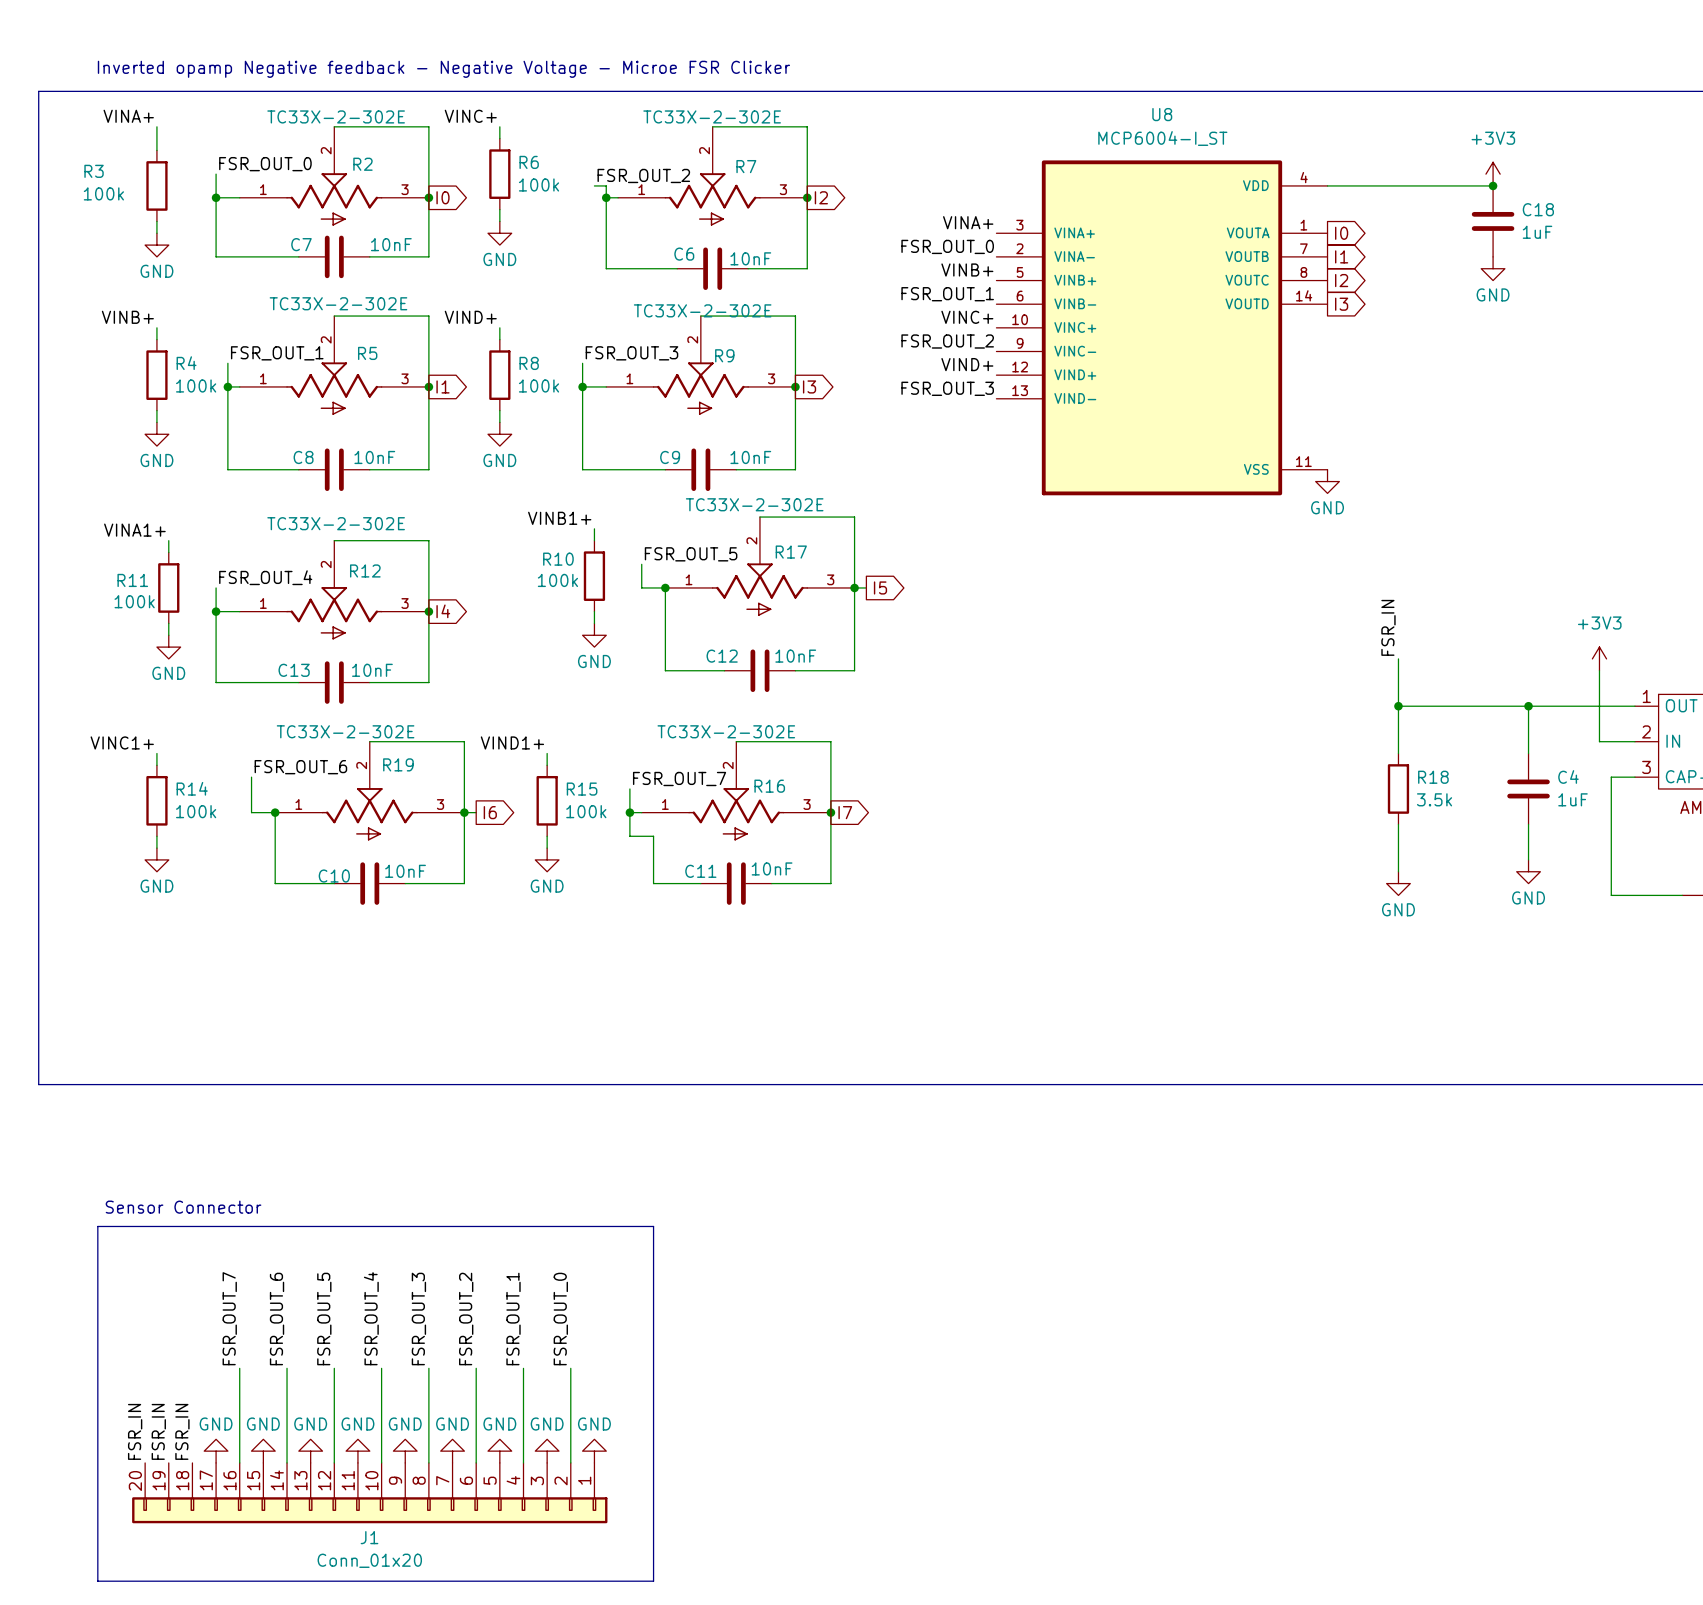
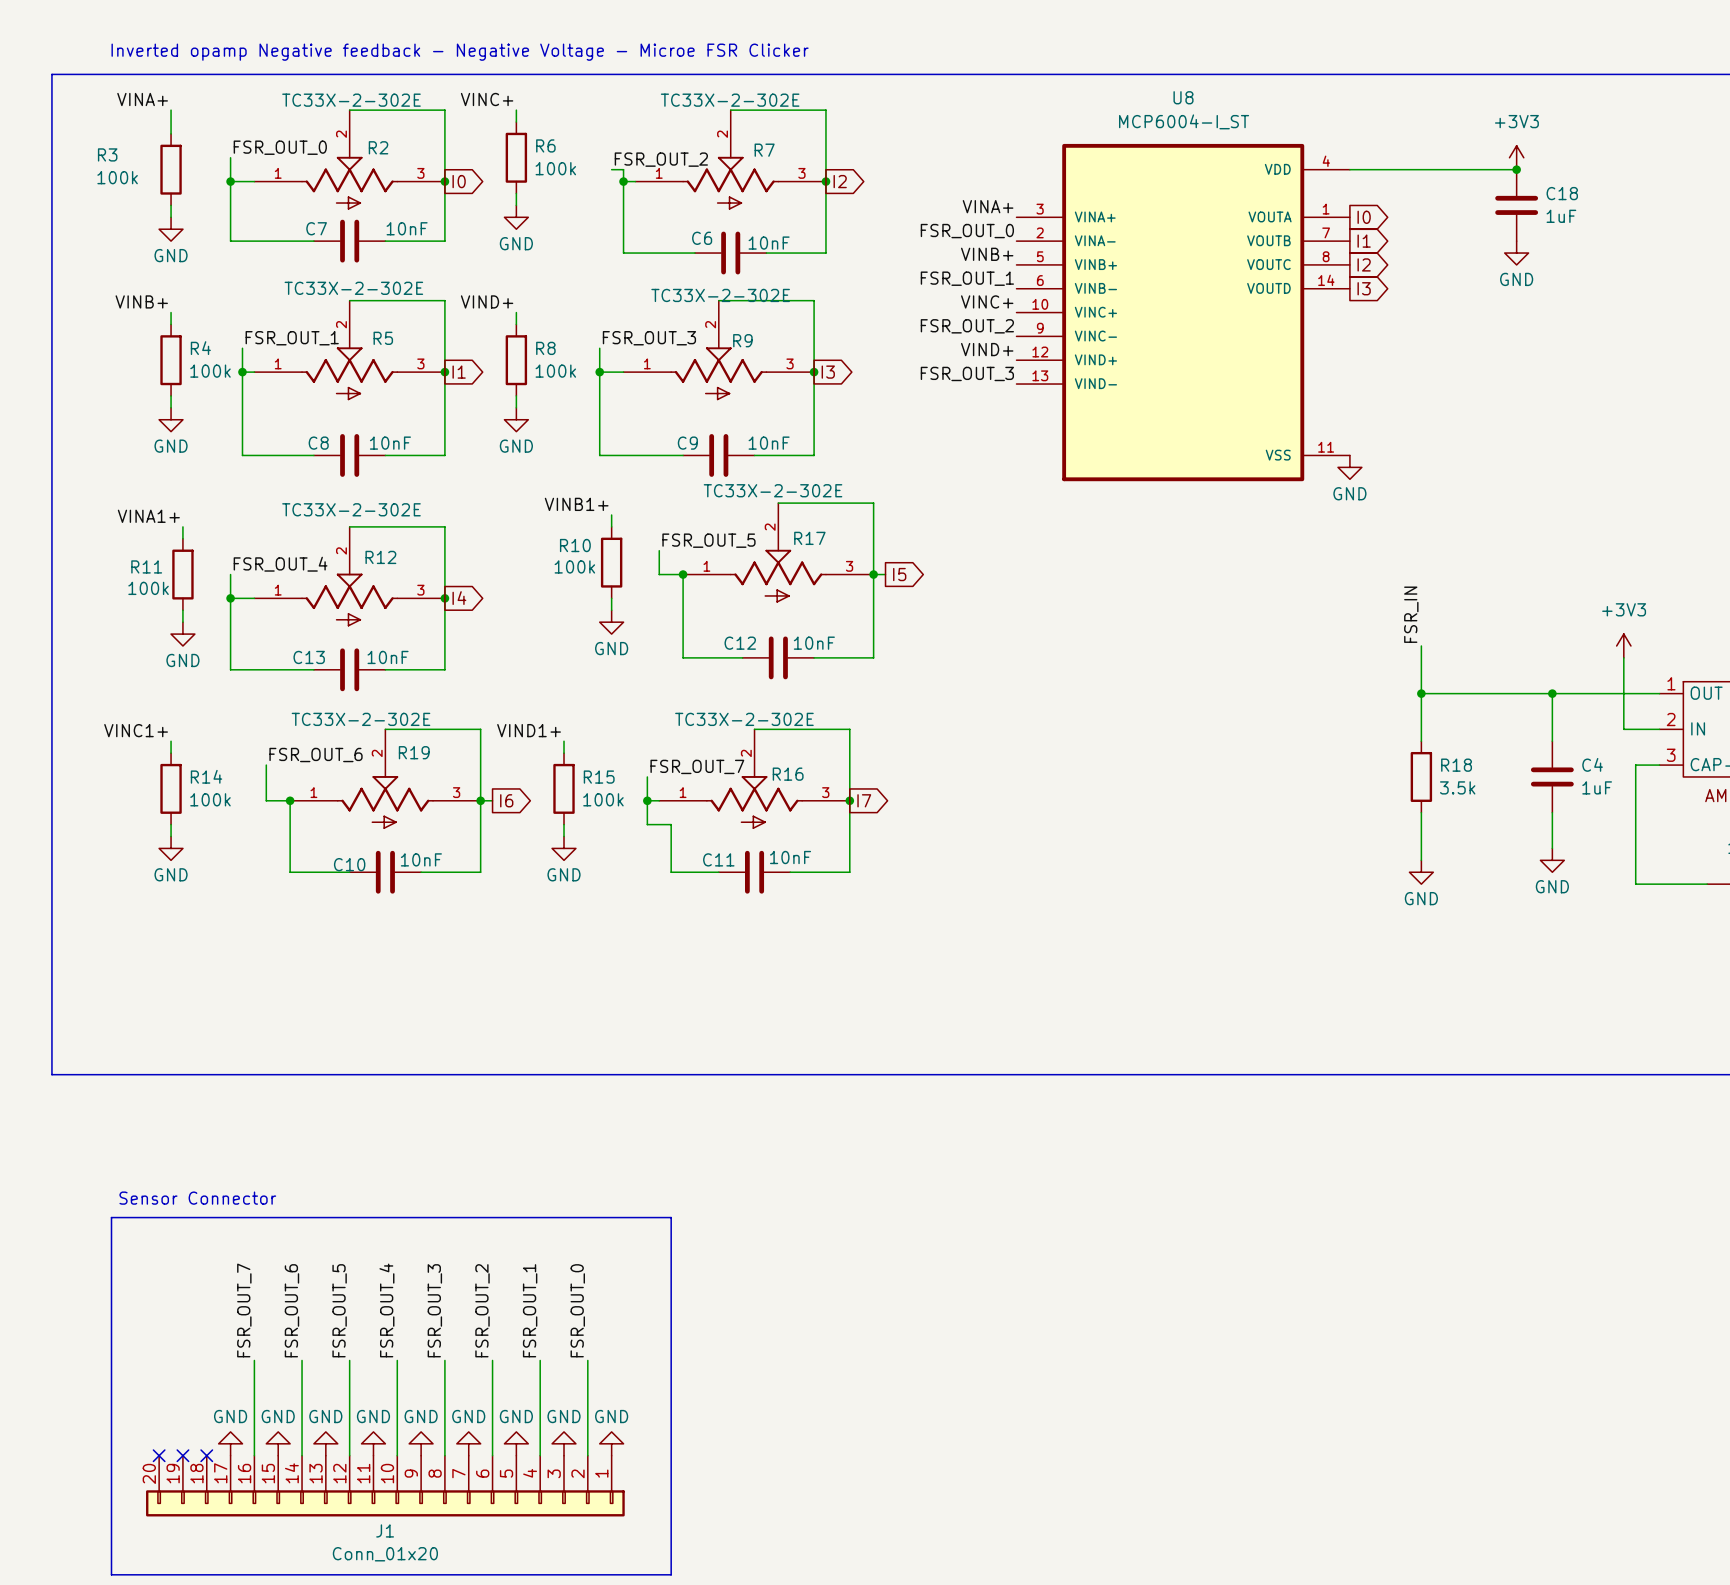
label: FSR_IN (135, 1431) -> none
label: FSR_IN (158, 1431) -> none
label: FSR_IN (182, 1431) -> none
no-connect mark: none -> (159, 1455)
no-connect mark: none -> (182, 1455)
no-connect mark: none -> (206, 1455)

